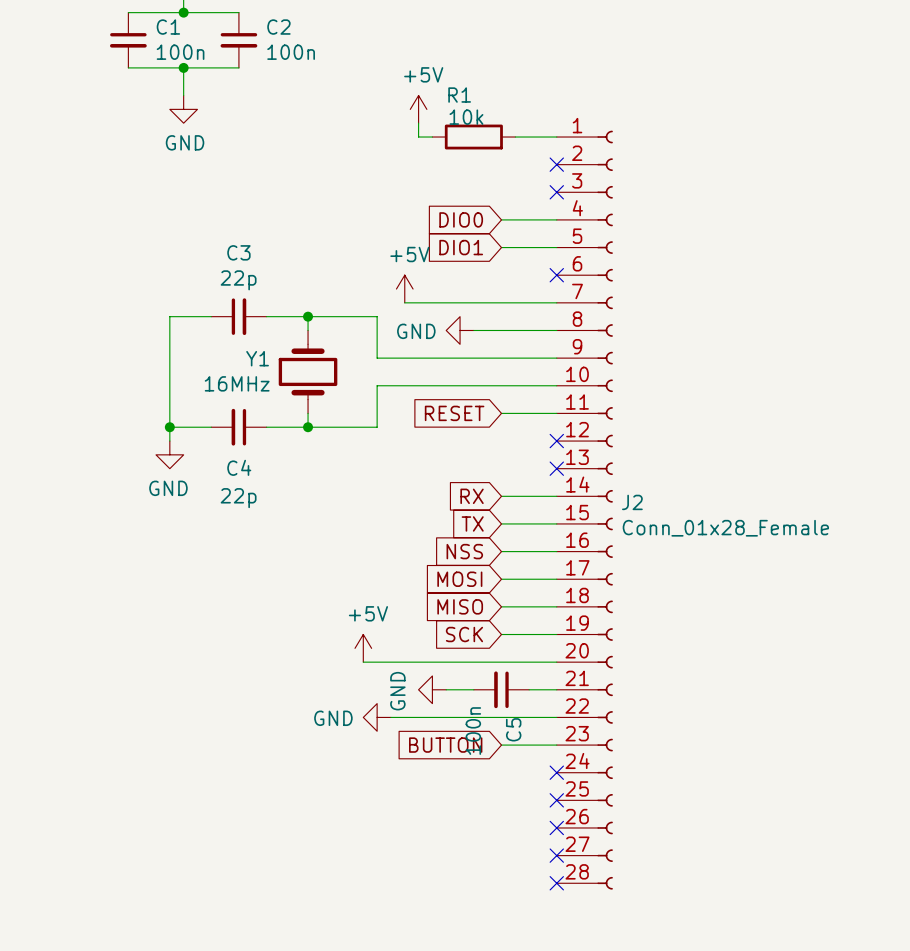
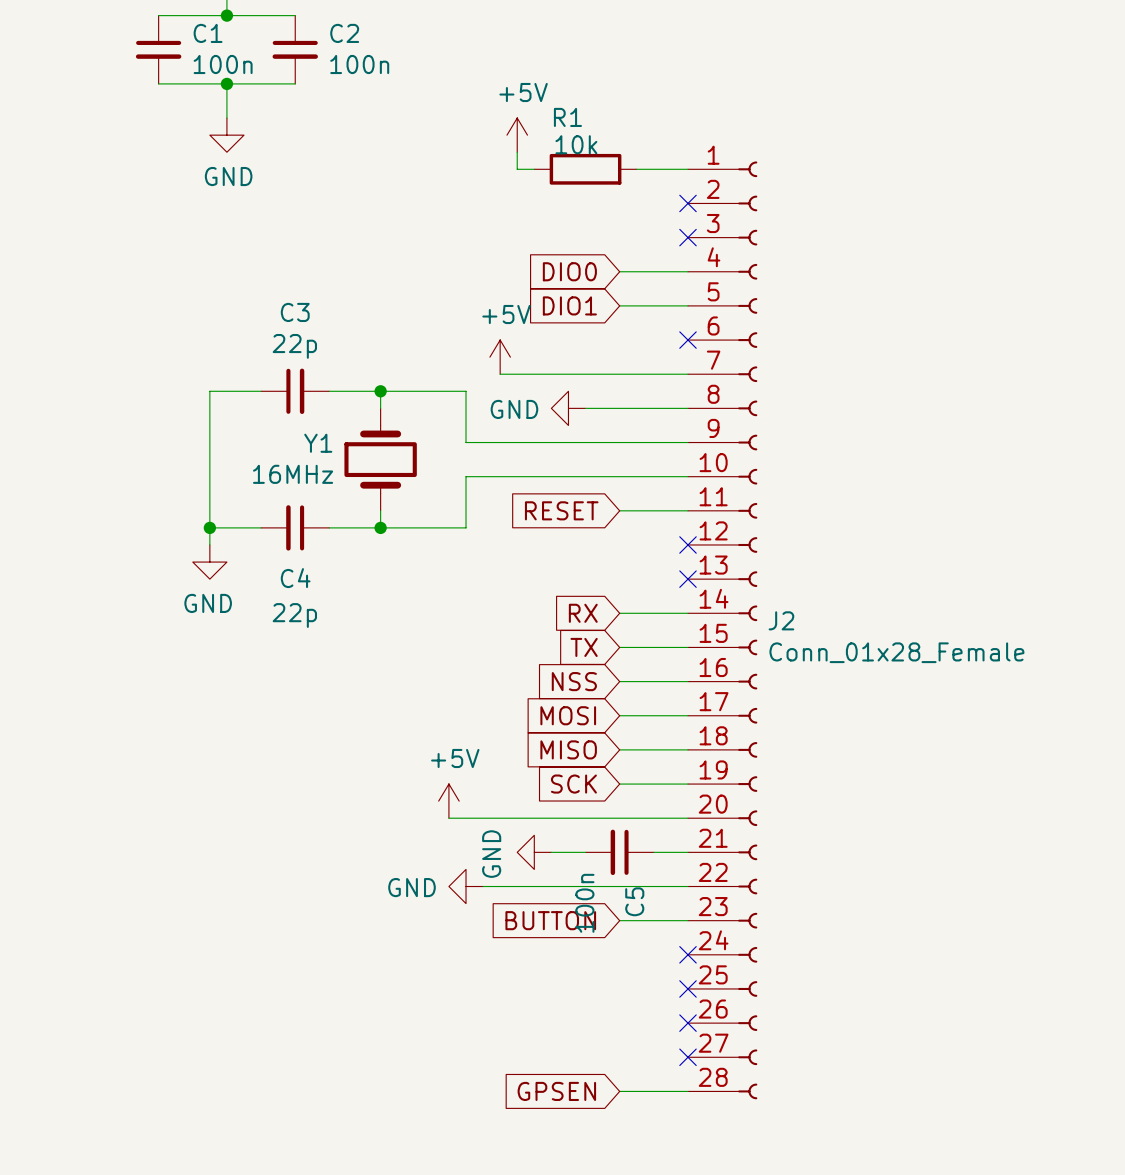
global label: none -> GPSEN (556, 1091)
wire: none -> (619, 1091) (688, 1091)
no-connect mark: (556, 883) -> none

